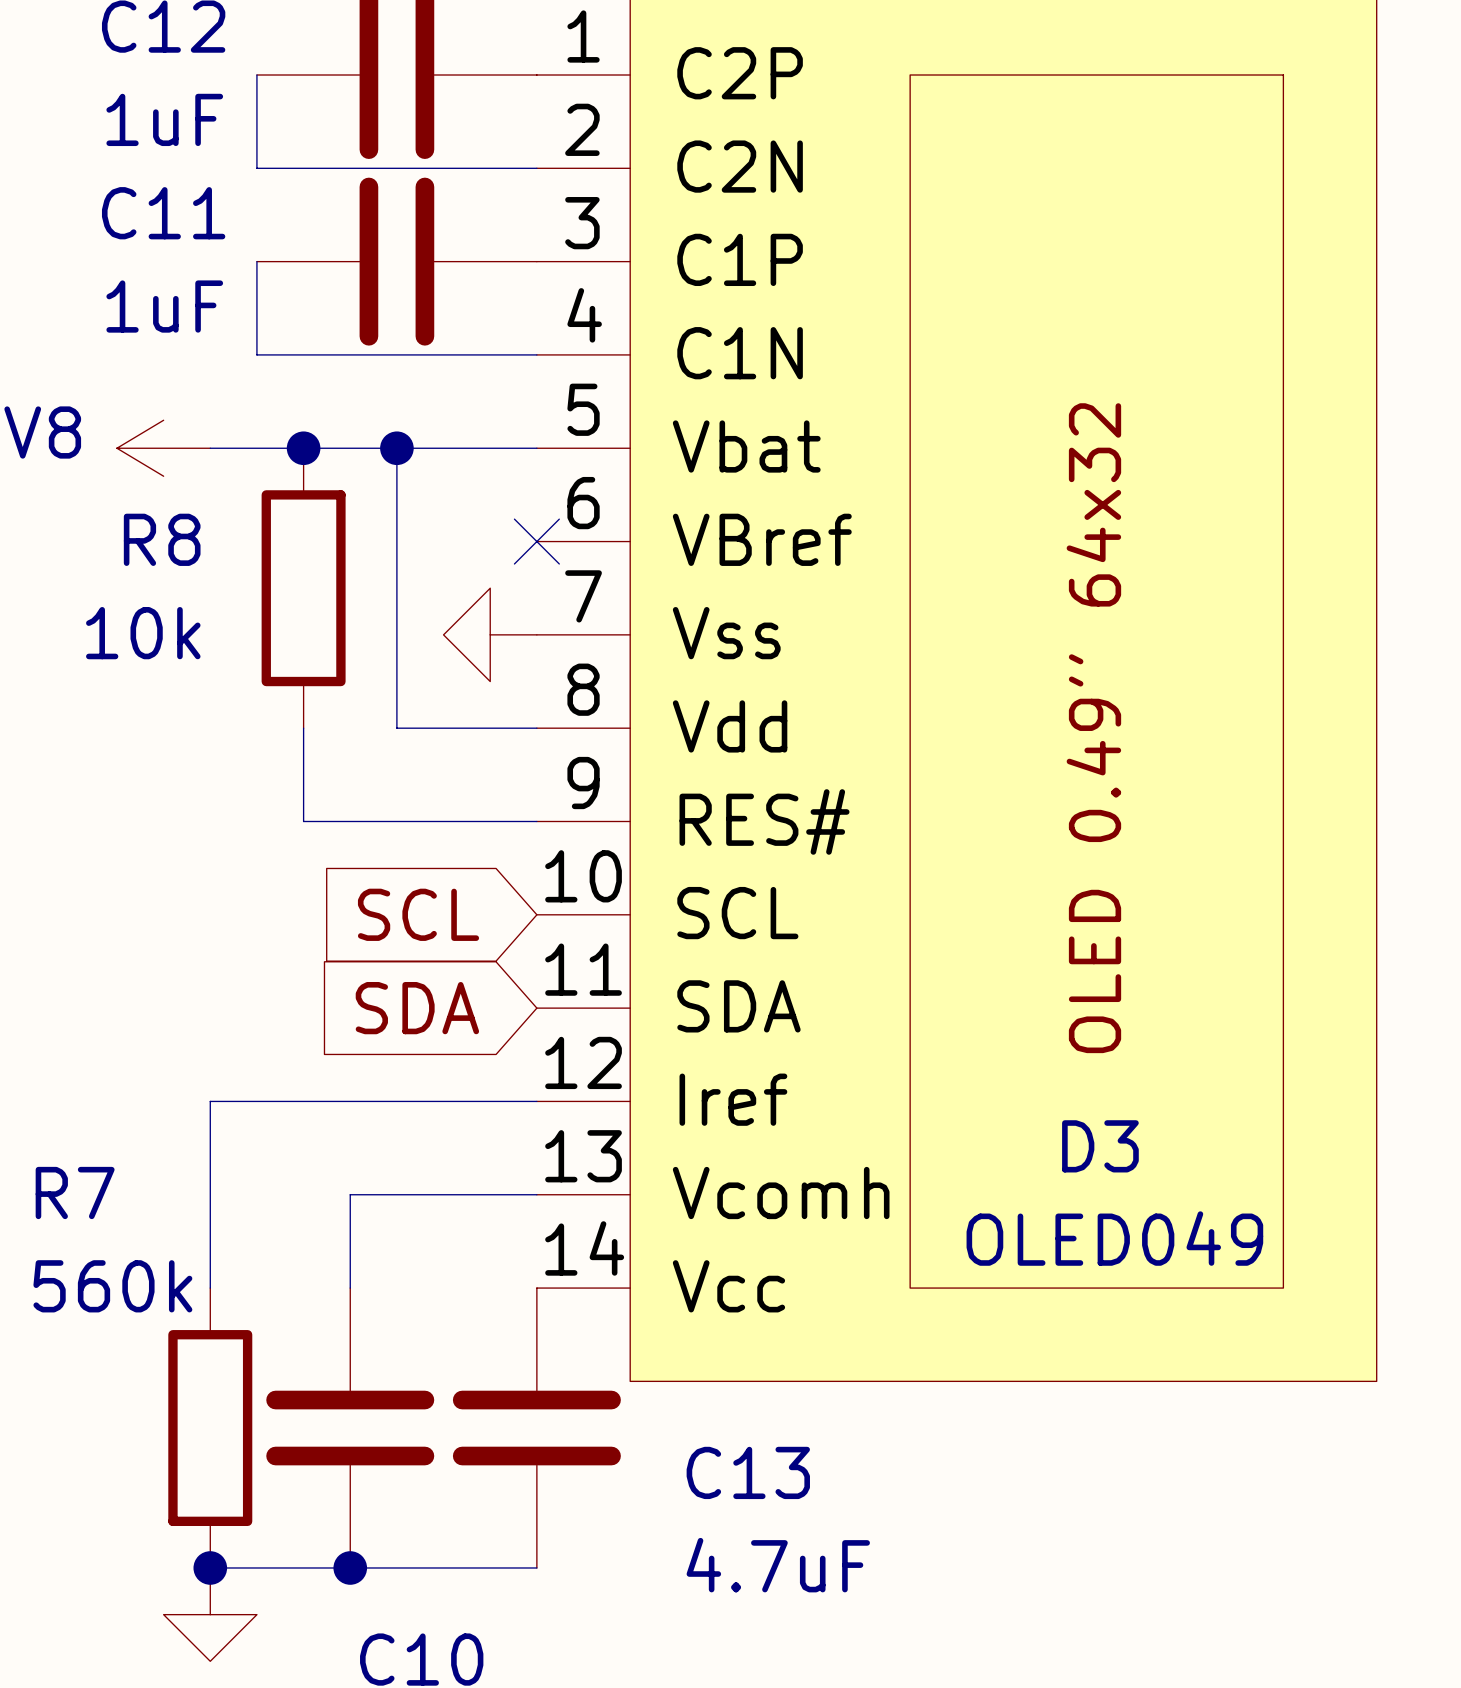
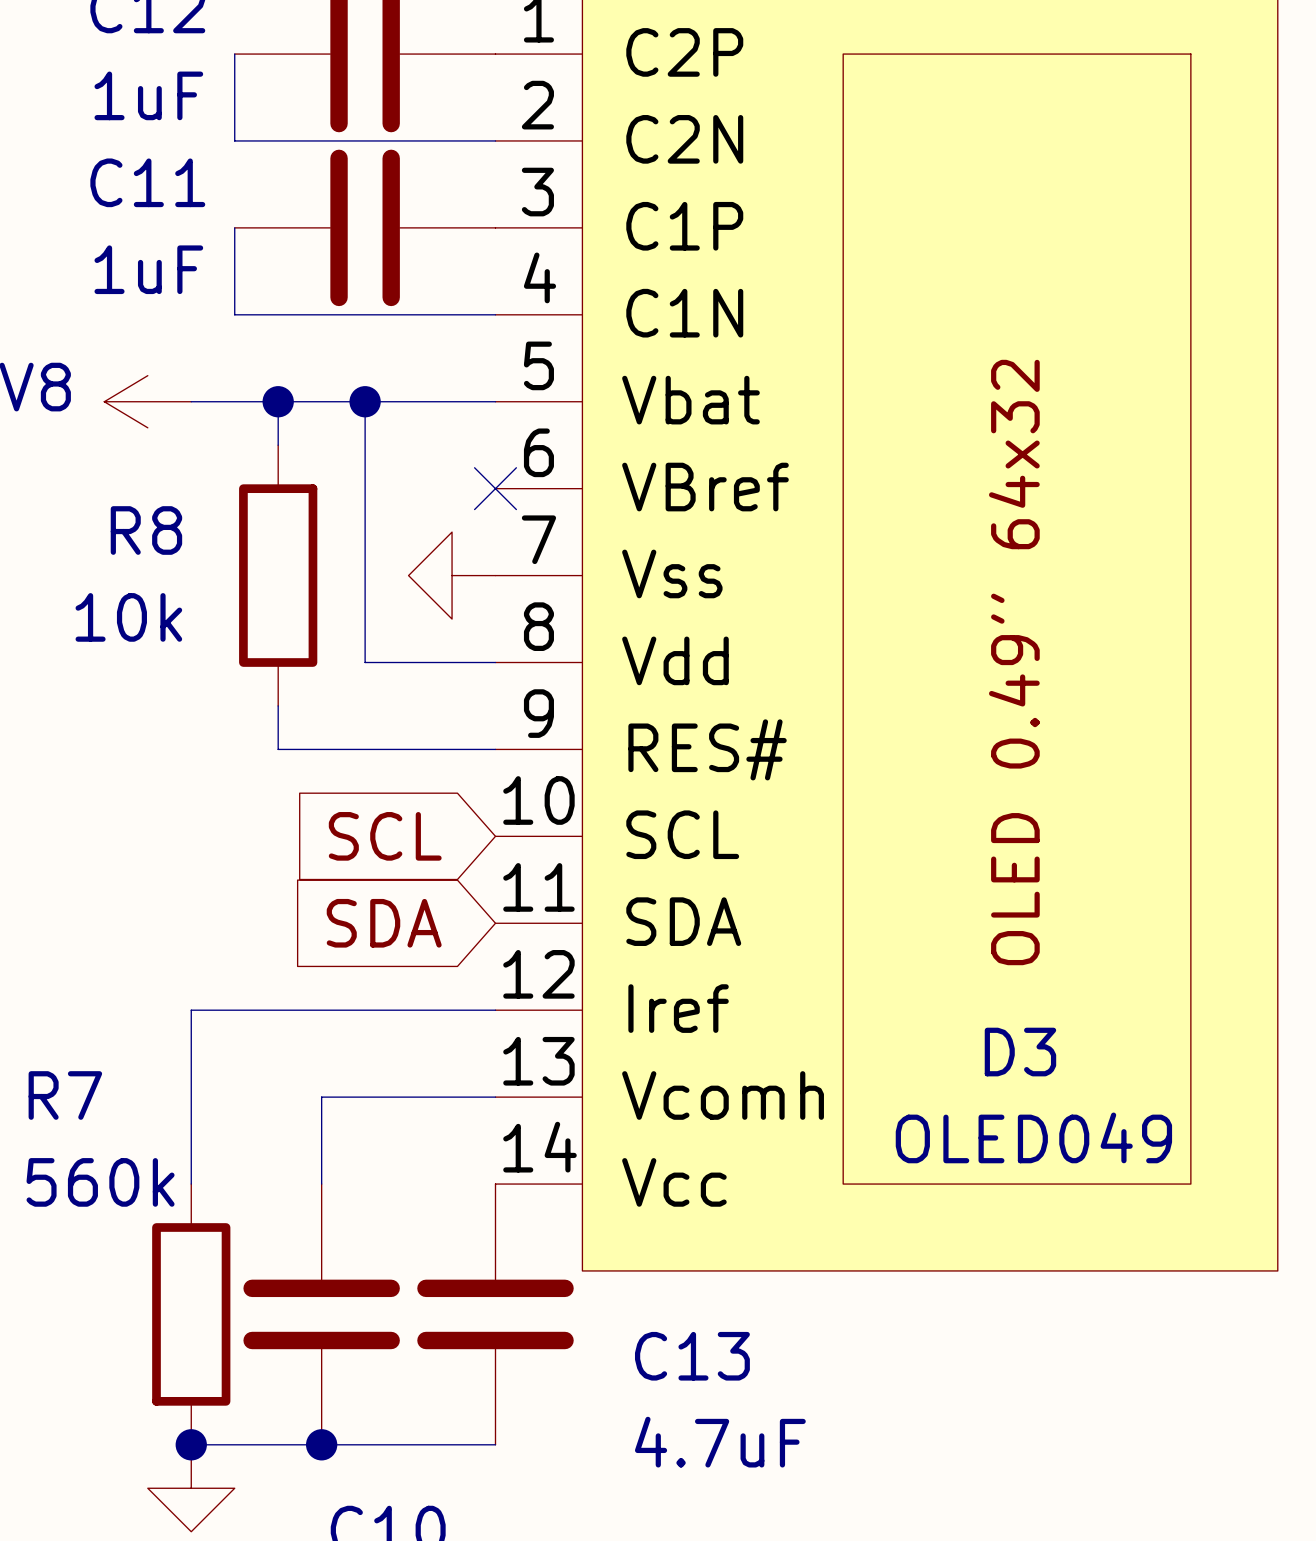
R8 position: (303, 588) -> (278, 575)

